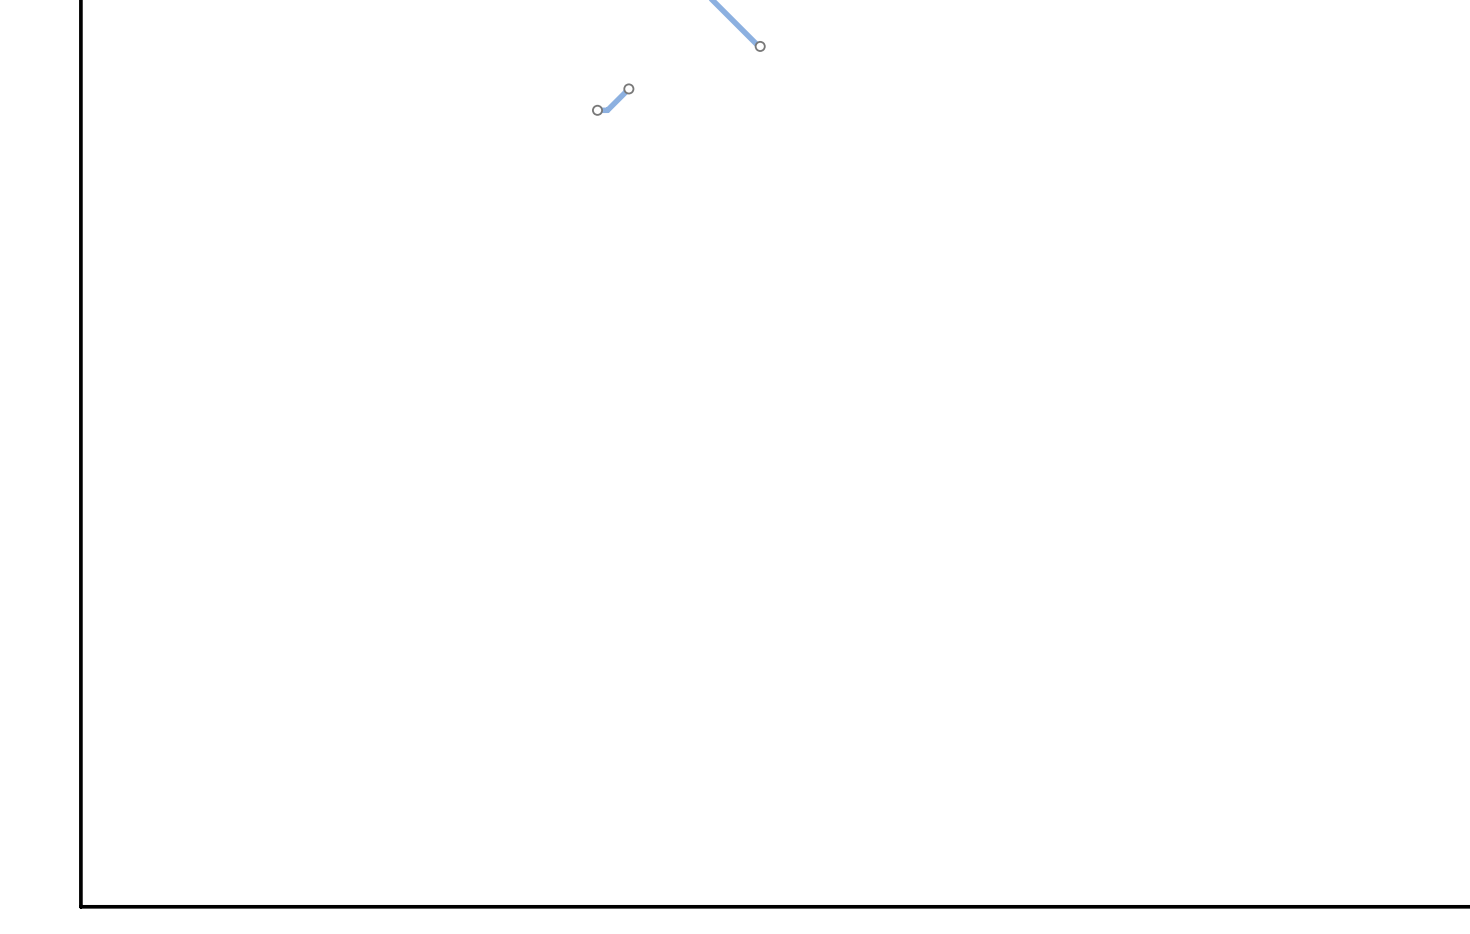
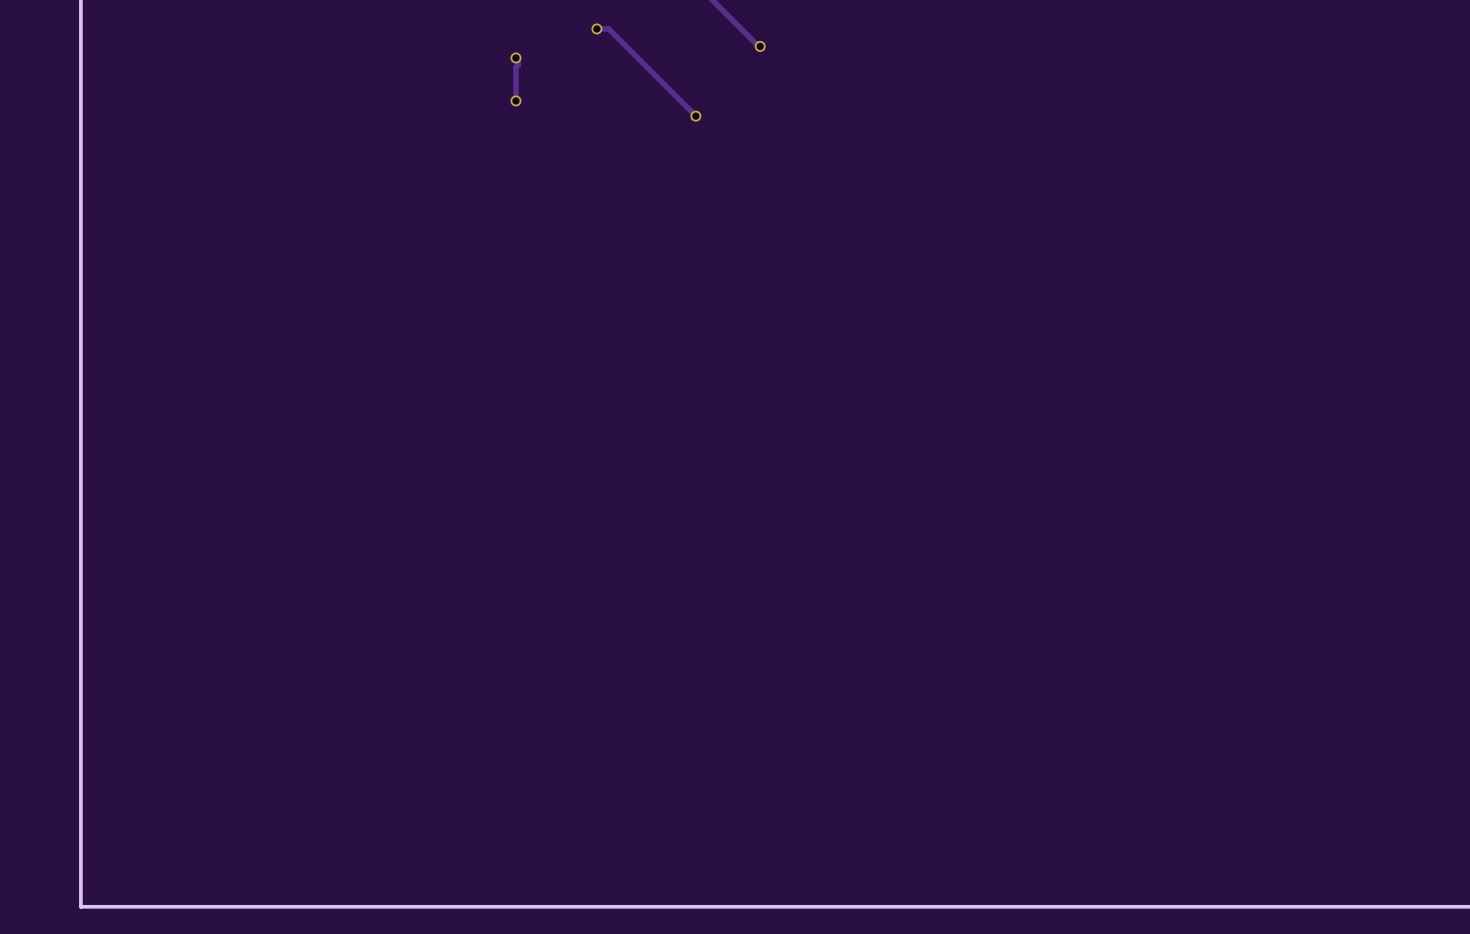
track: none -> (596, 28) (608, 28) (695, 116)
via: none -> (596, 28)
track: none -> (515, 57) (518, 60) (515, 67) (515, 100)
via: none -> (515, 57)
track: (628, 88) (607, 110) (597, 110) -> none
via: (628, 88) -> none
via: none -> (515, 100)
via: (597, 110) -> none
via: none -> (695, 116)

